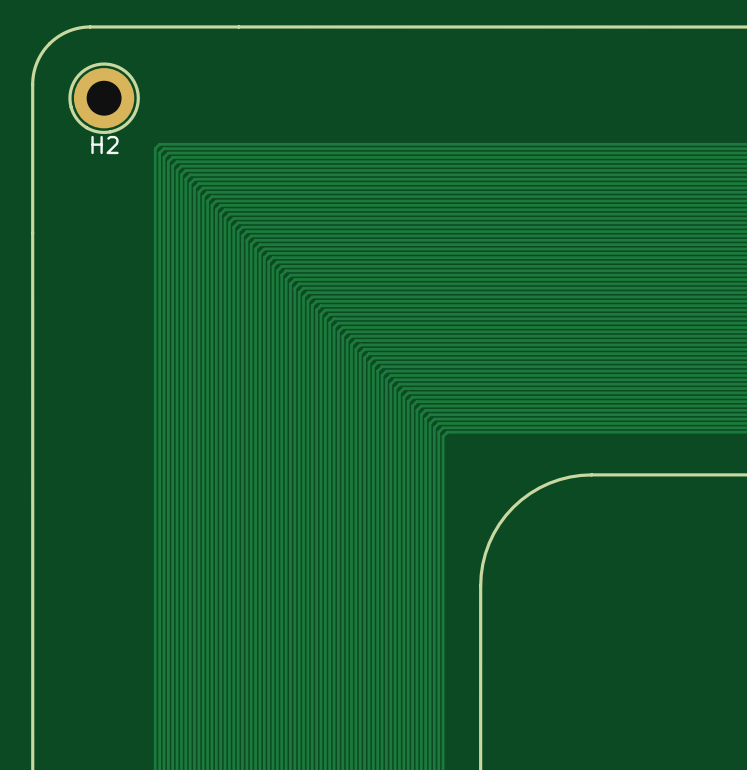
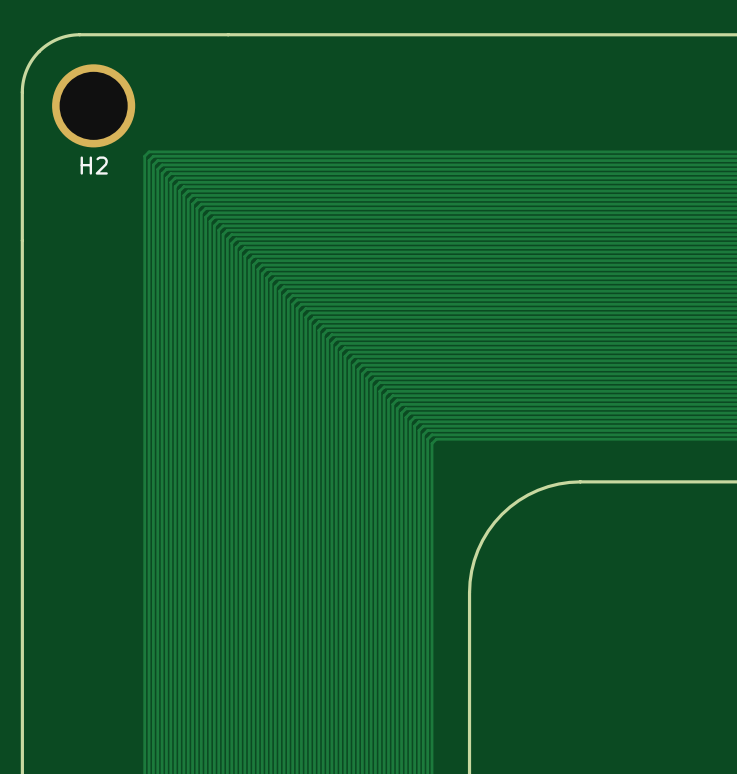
H2 footprint: [73, 68, 135, 129] -> [52, 64, 136, 148]
board edge: (71, 107) (78, 120) (88, 128) (101, 132) (114, 130) (125, 124) (134, 114) (138, 102) (137, 89) (131, 77) (118, 67) (105, 64) (93, 65) (81, 72) (73, 82) (70, 94) (71, 107) -> none

